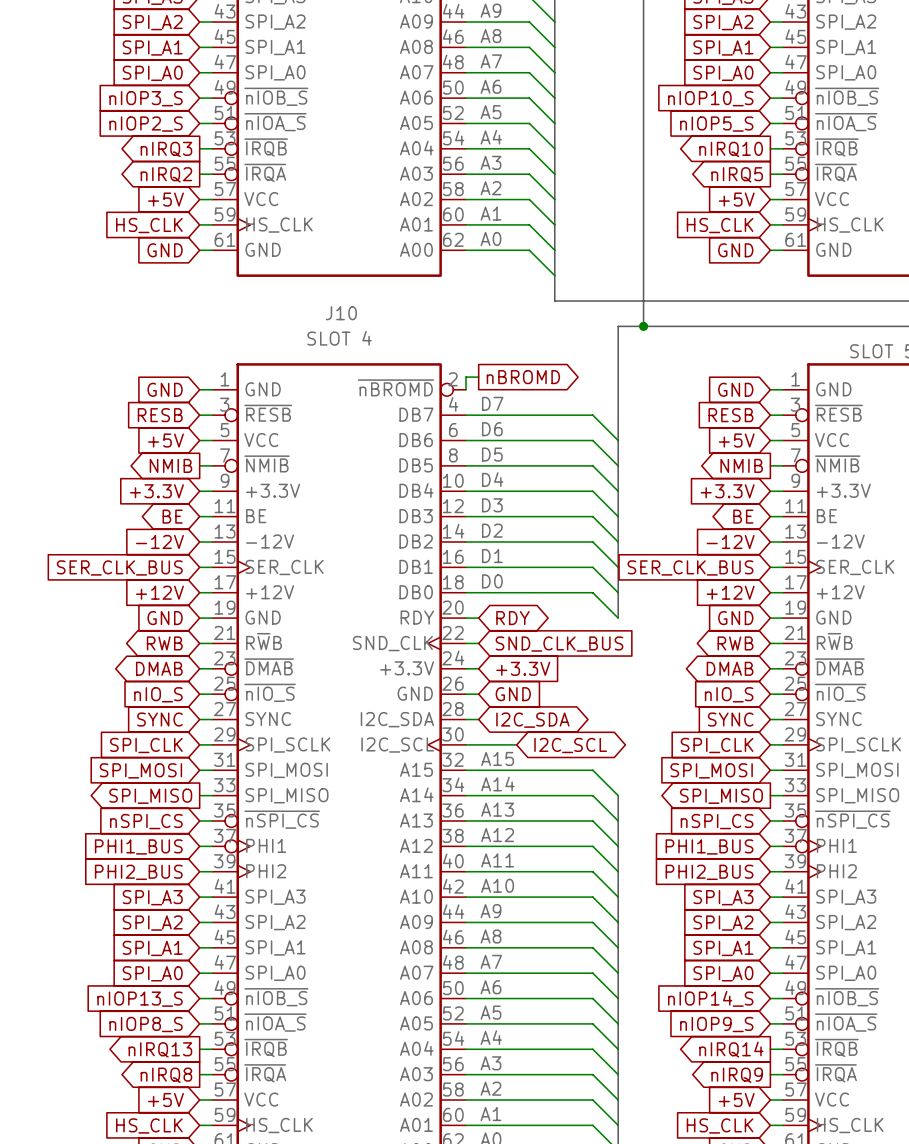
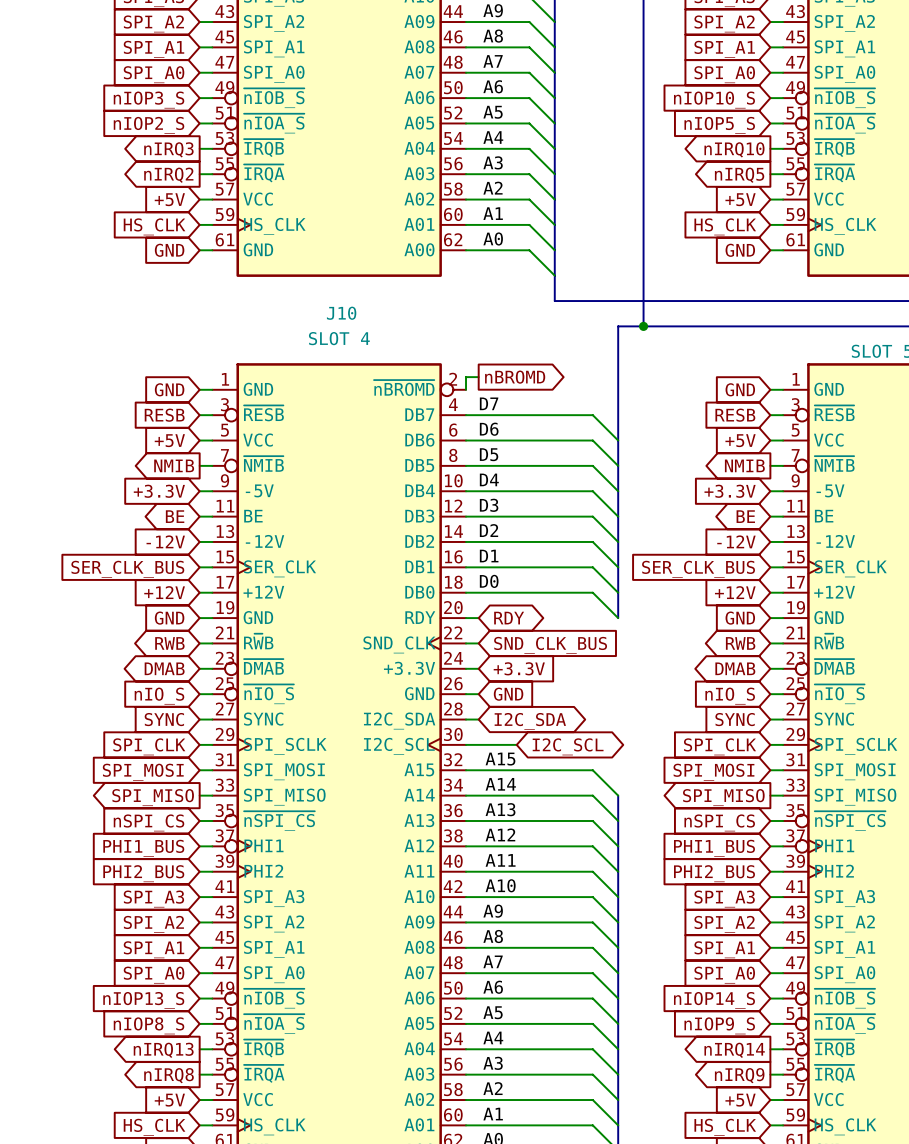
J10 pin name: +3.3V (273, 490) -> -5V (259, 490)
part pin name: +3.3V (843, 490) -> -5V (830, 490)

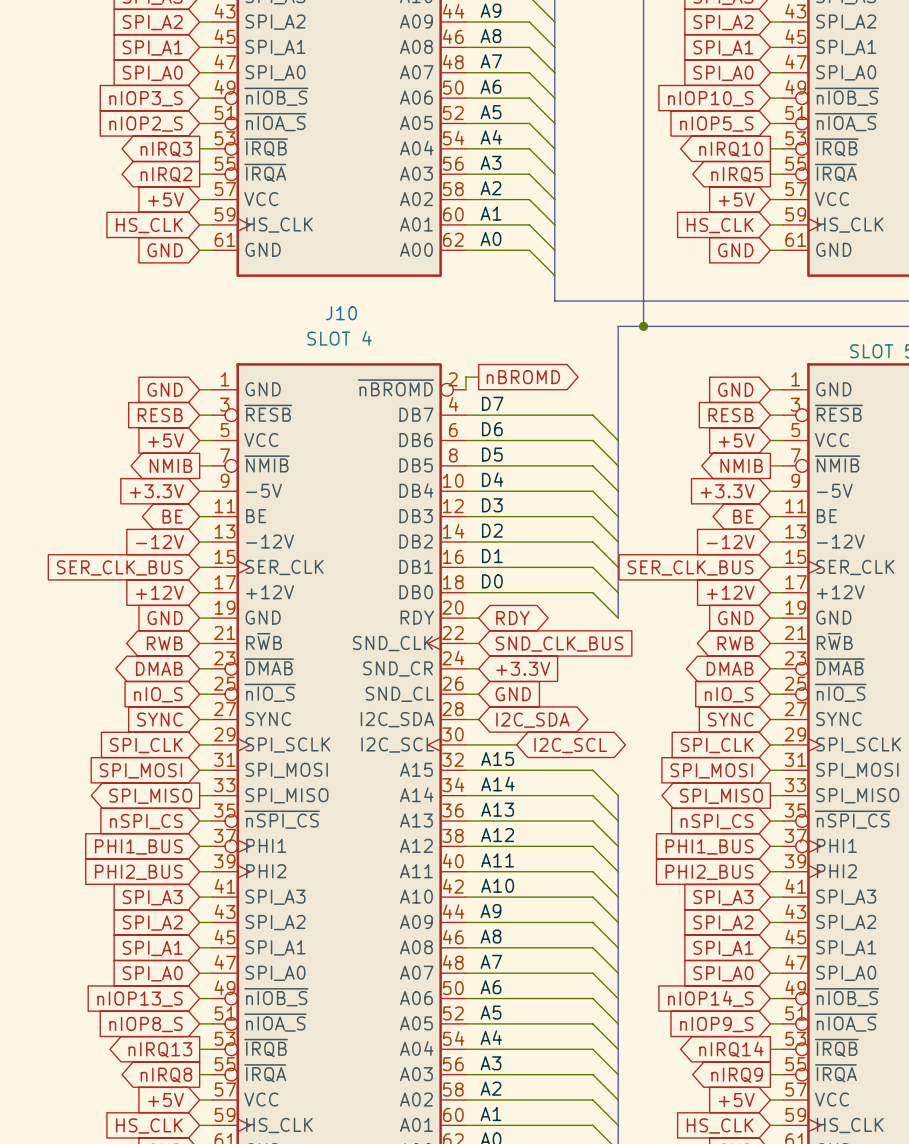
J10 pin name: +3.3V (409, 668) -> SND_CR (398, 668)
J10 pin name: GND (419, 693) -> SND_CL (399, 694)

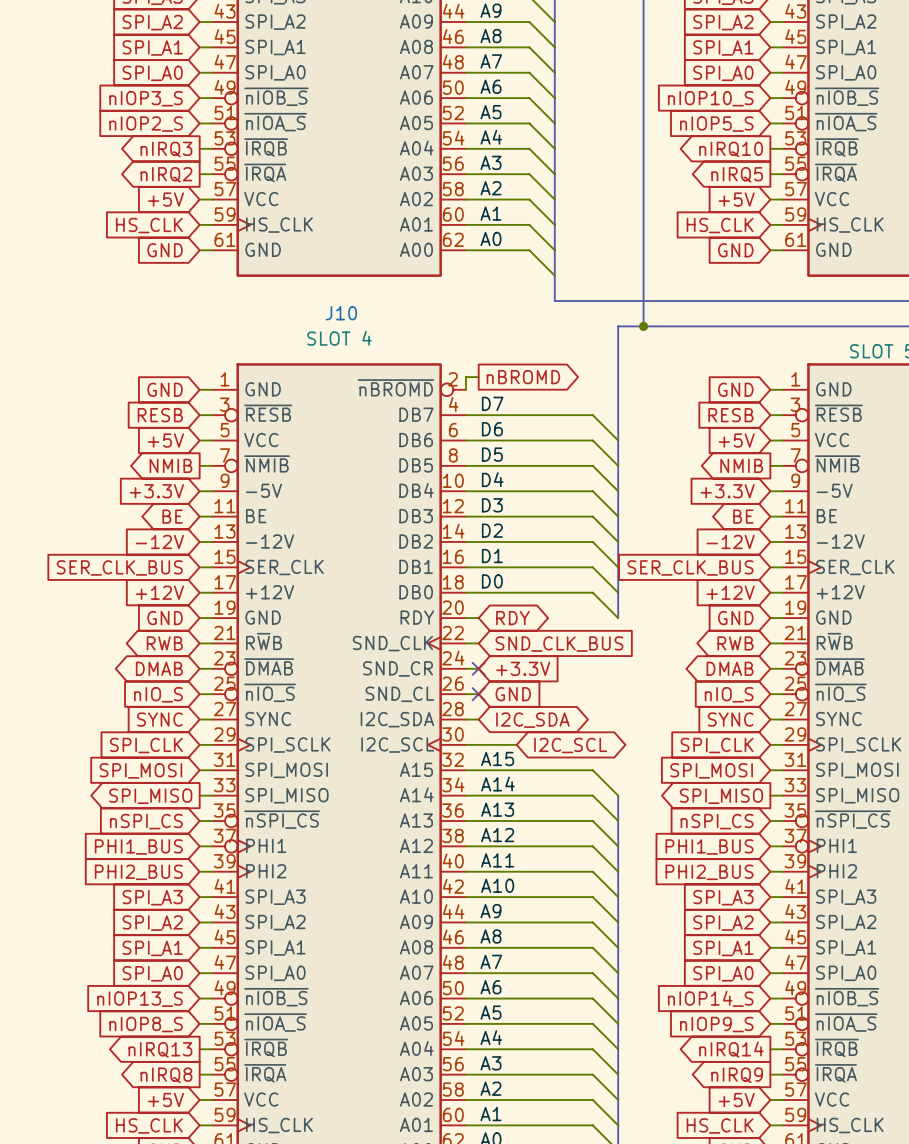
no-connect mark: none -> (478, 668)
no-connect mark: none -> (478, 694)

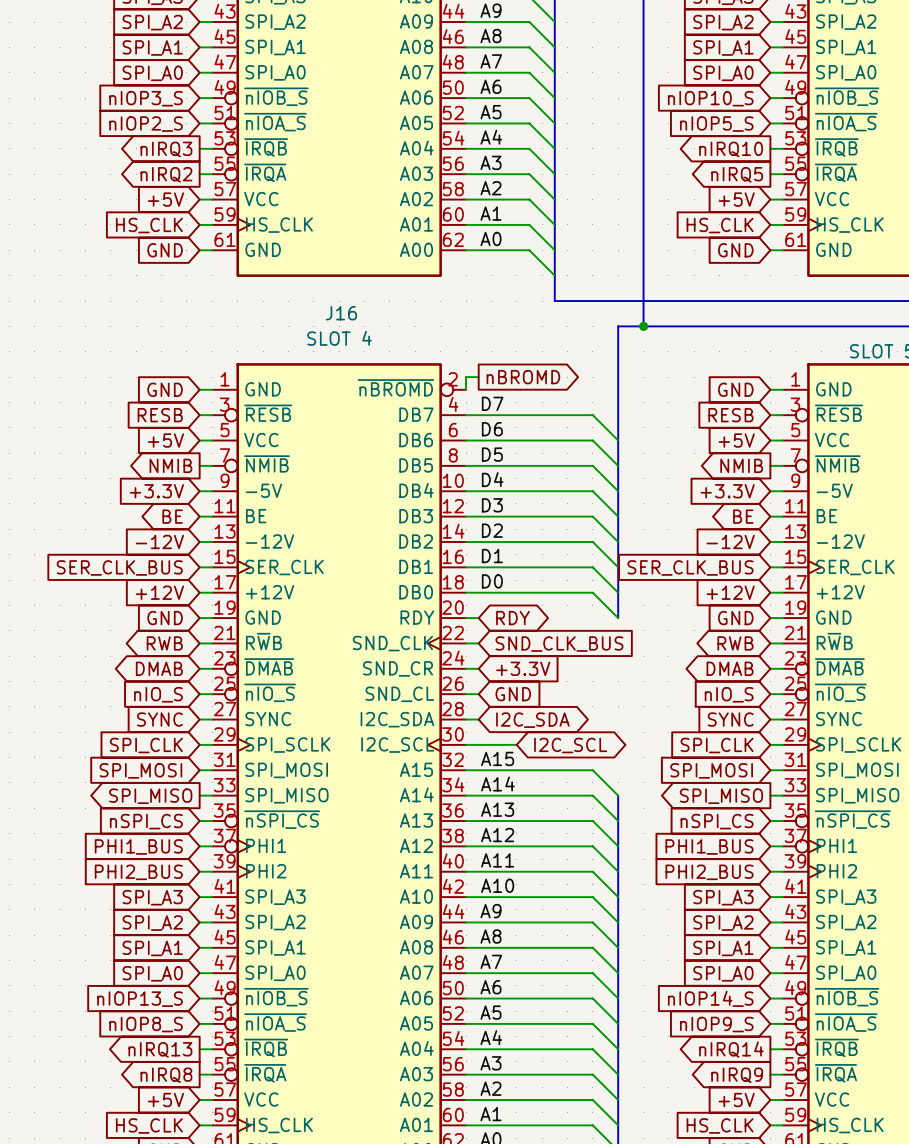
J10 name: J10 (341, 313) -> J16 (341, 313)
no-connect mark: (478, 668) -> none
no-connect mark: (478, 694) -> none

